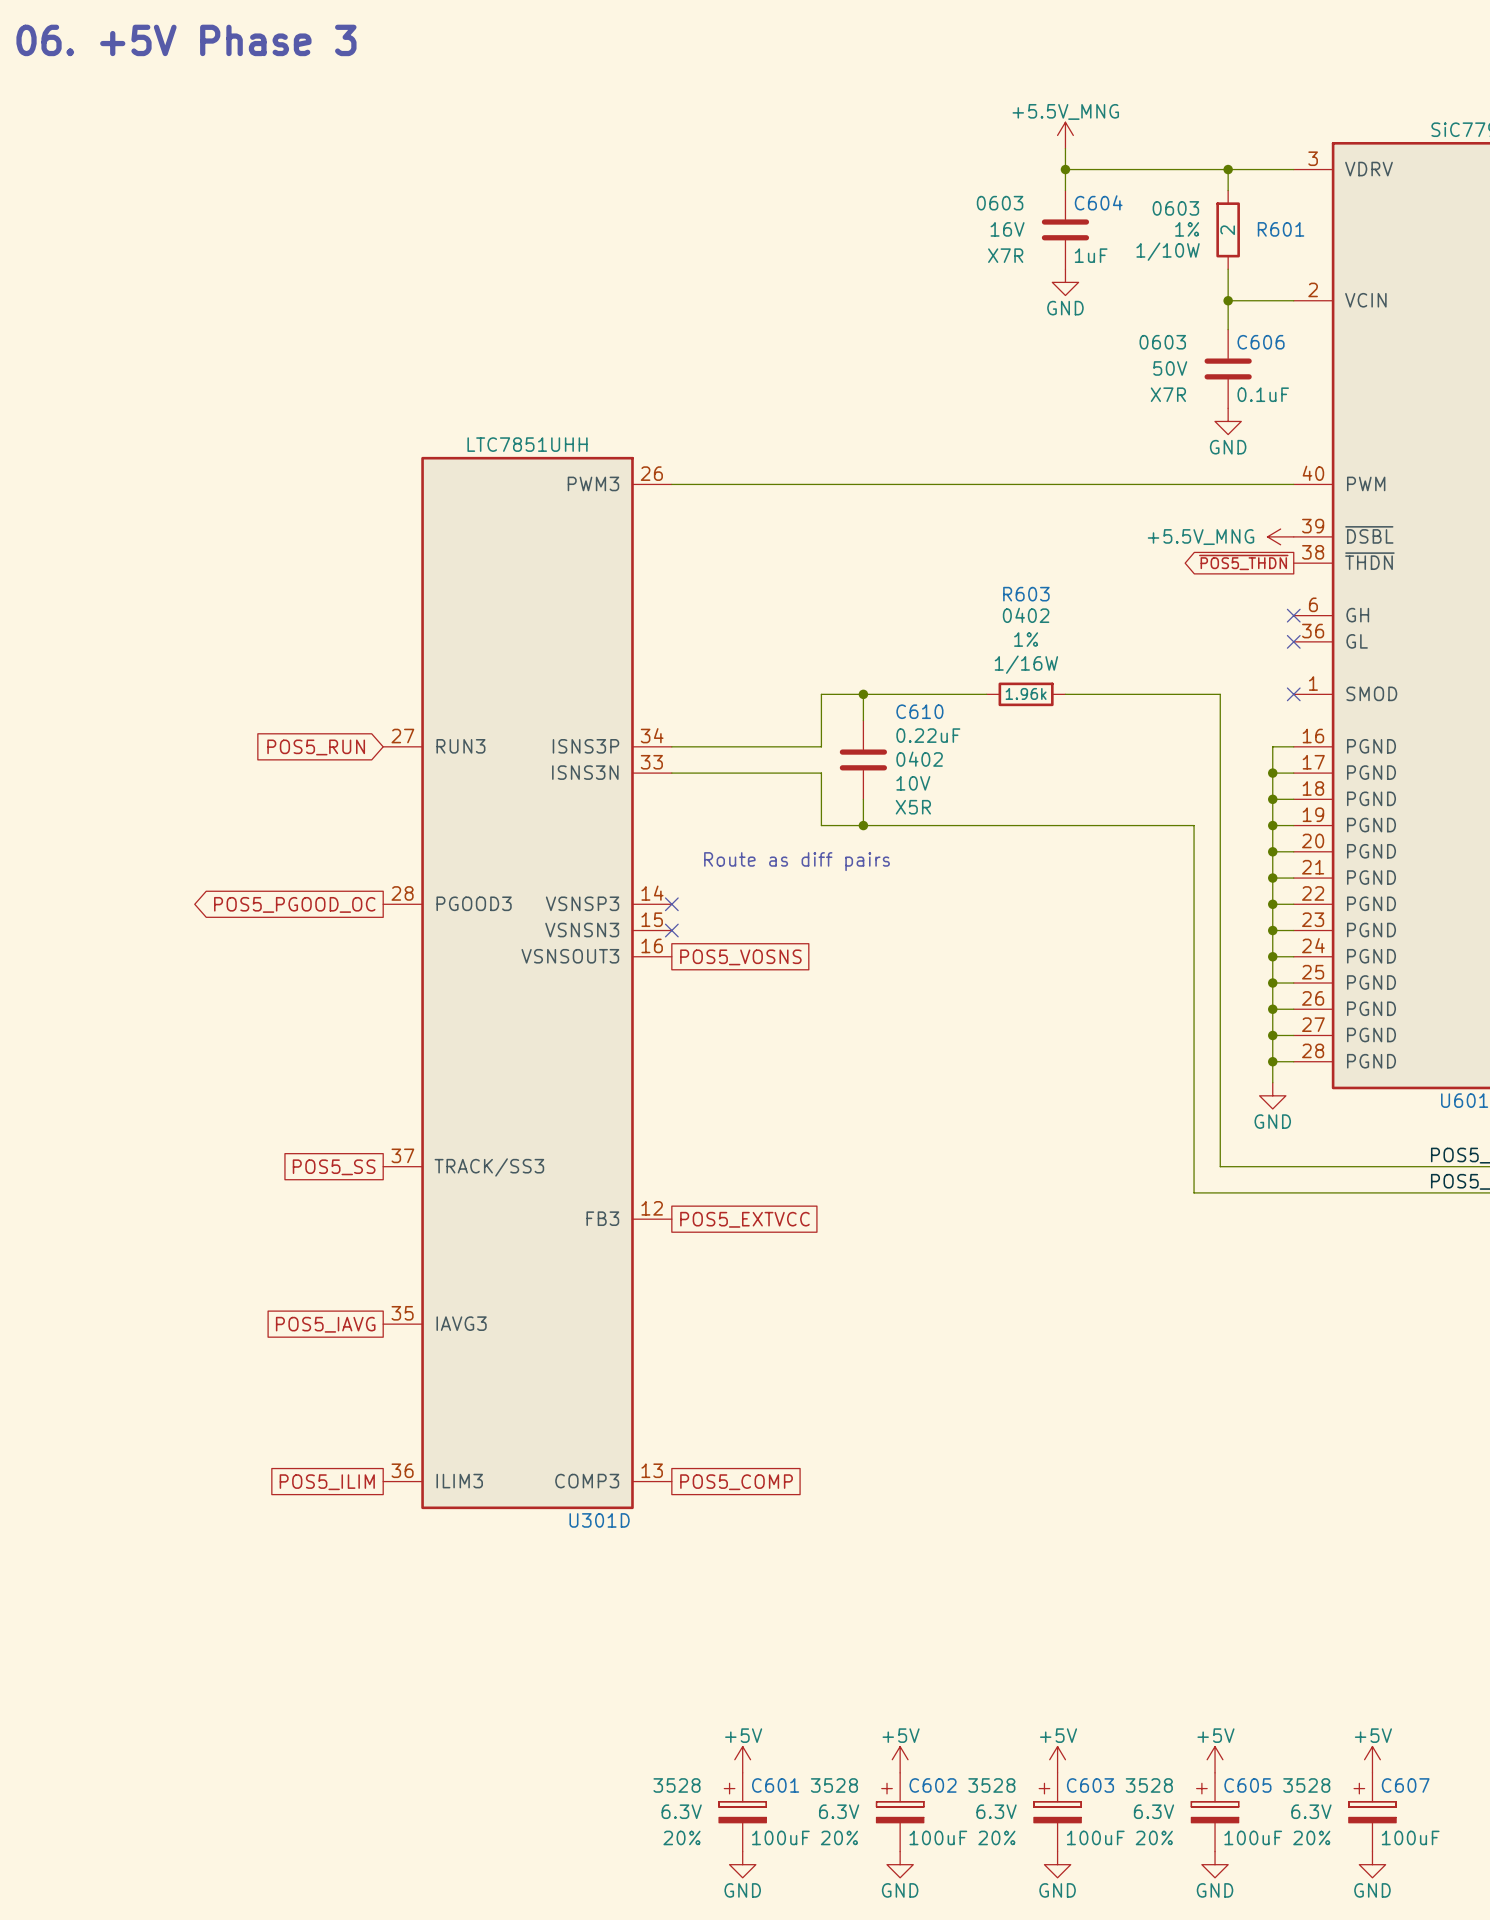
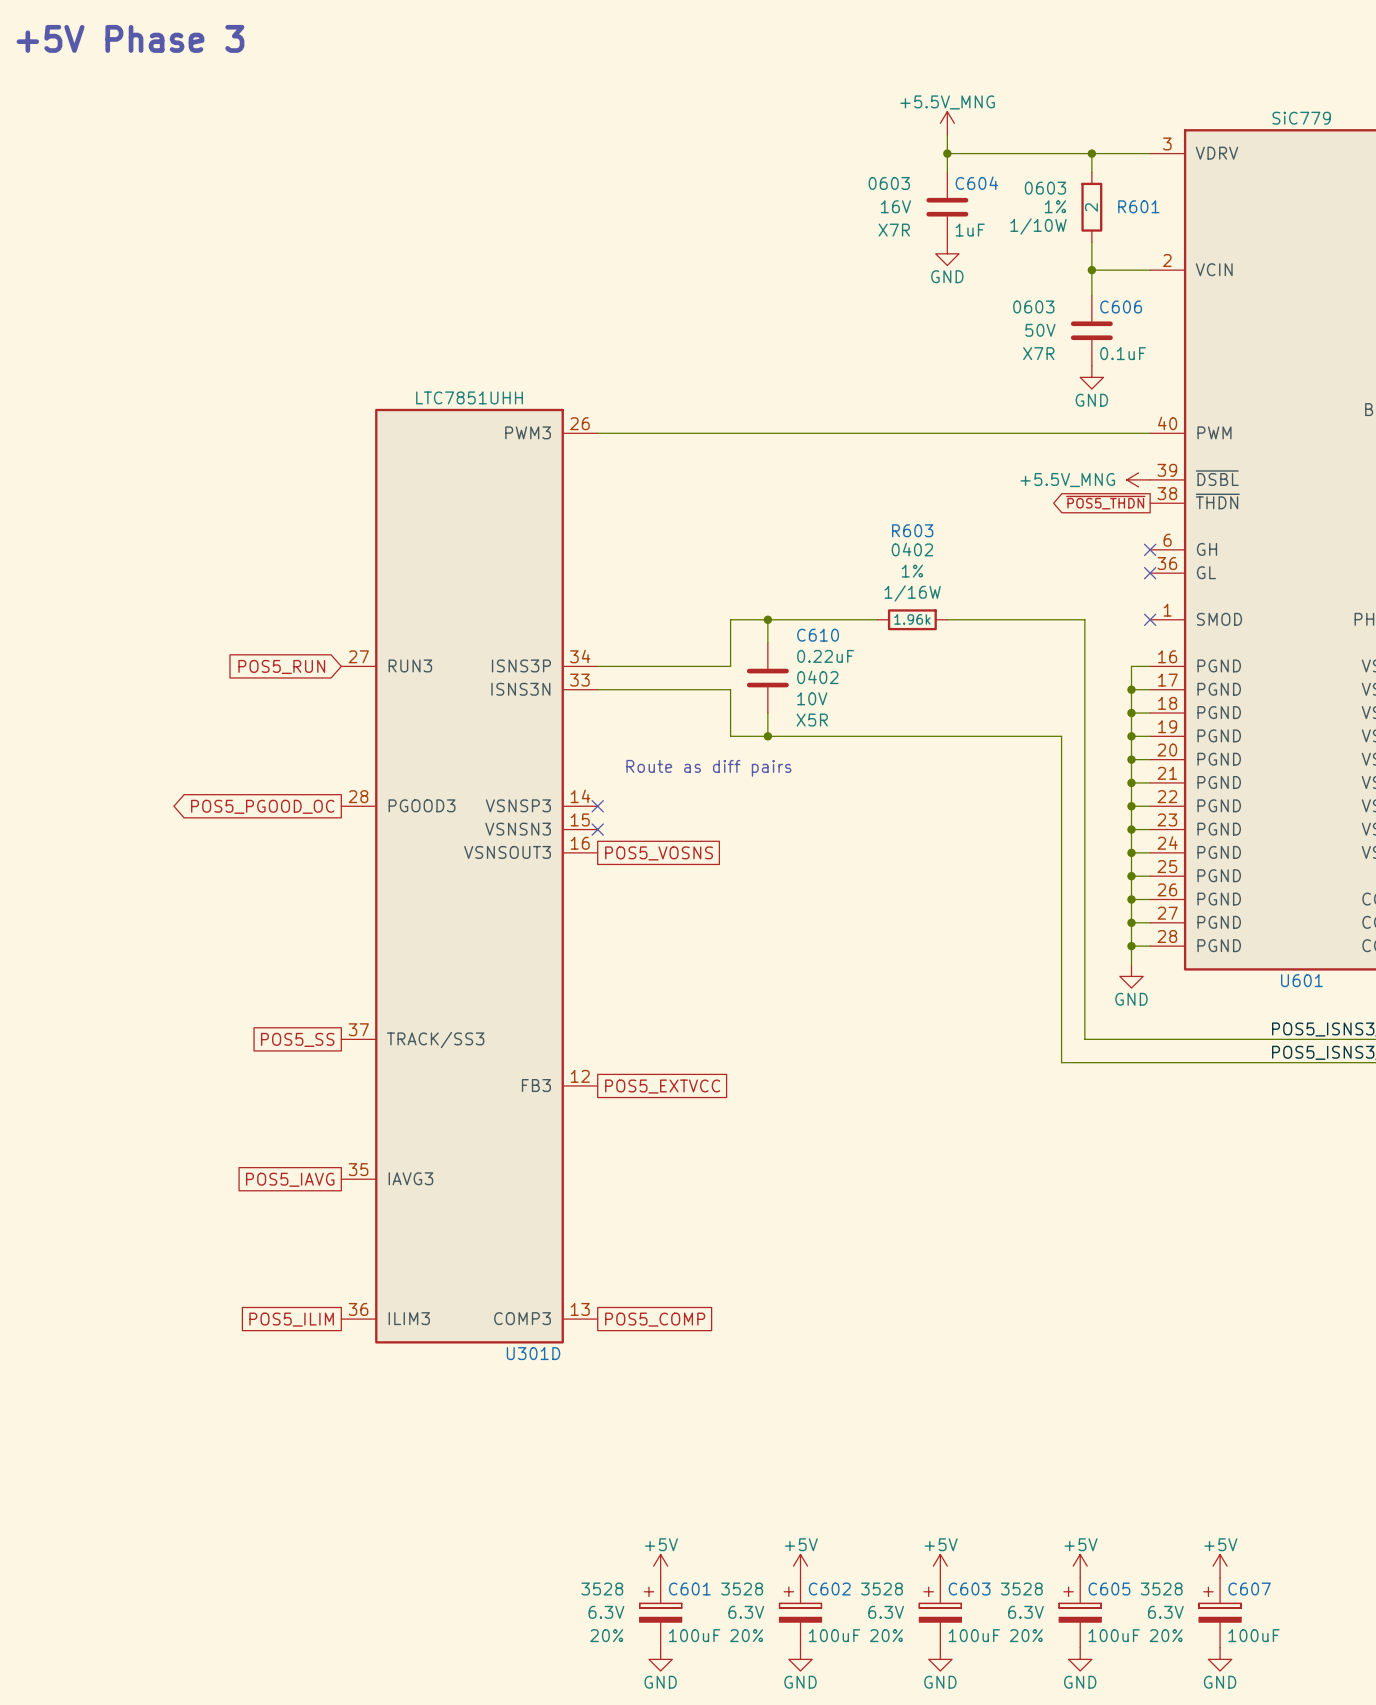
text: 06. +5V Phase 3 (186, 40) -> +5V Phase 3 (130, 38)

